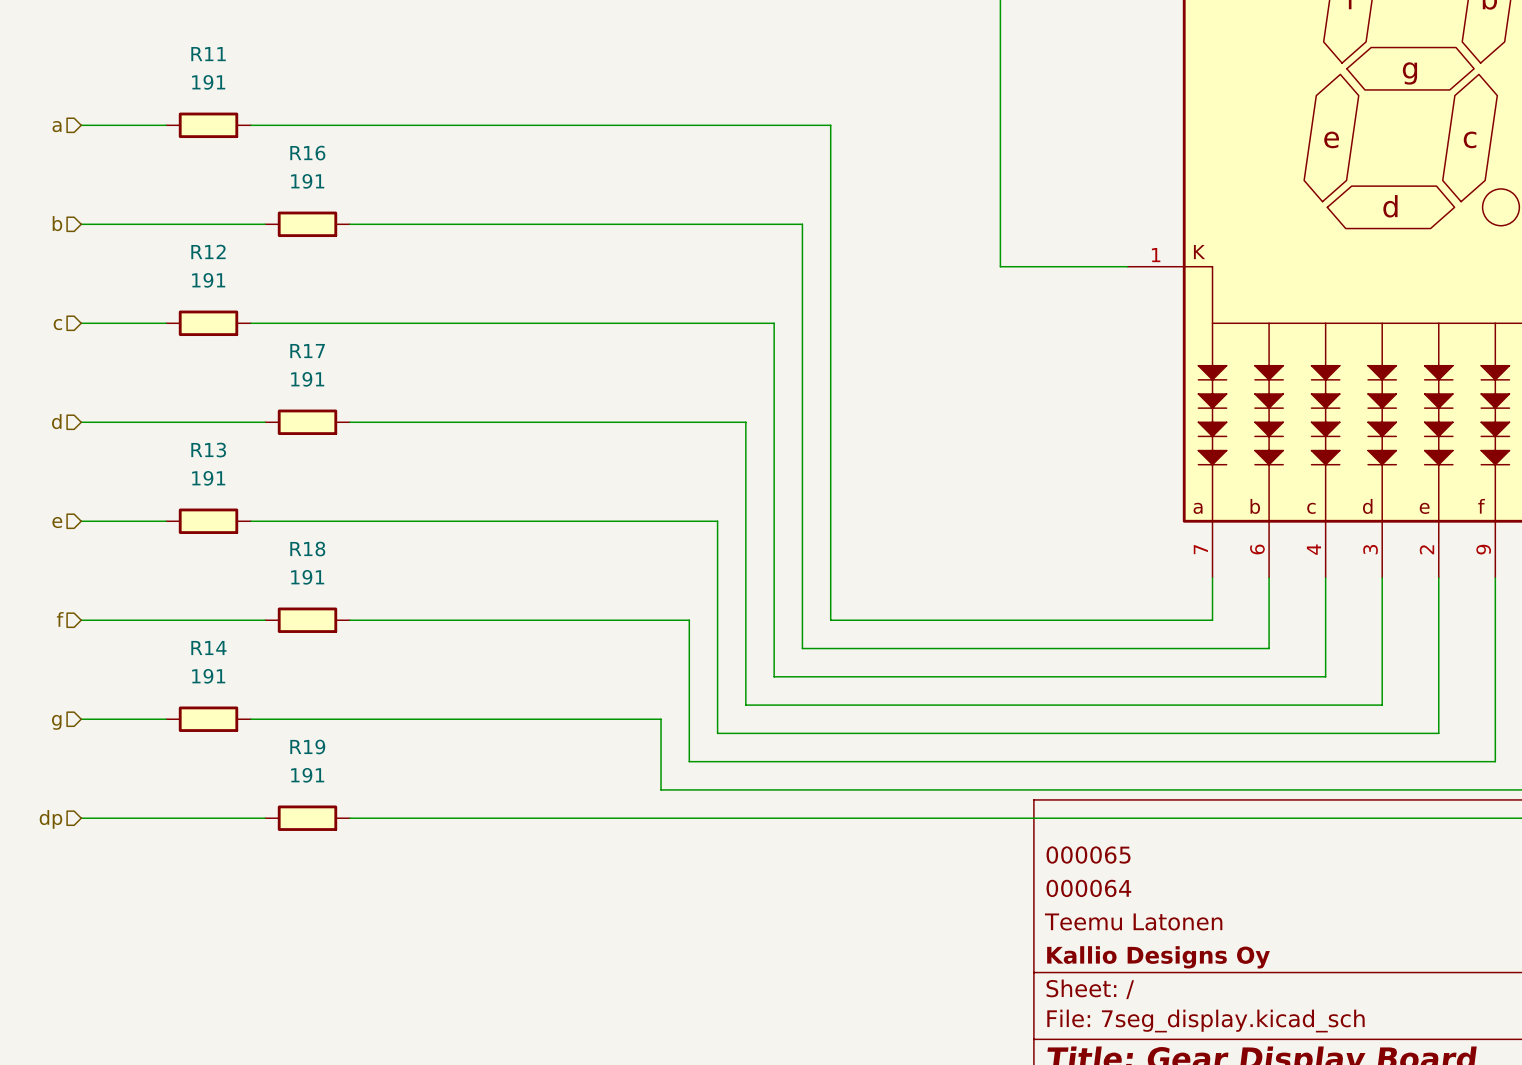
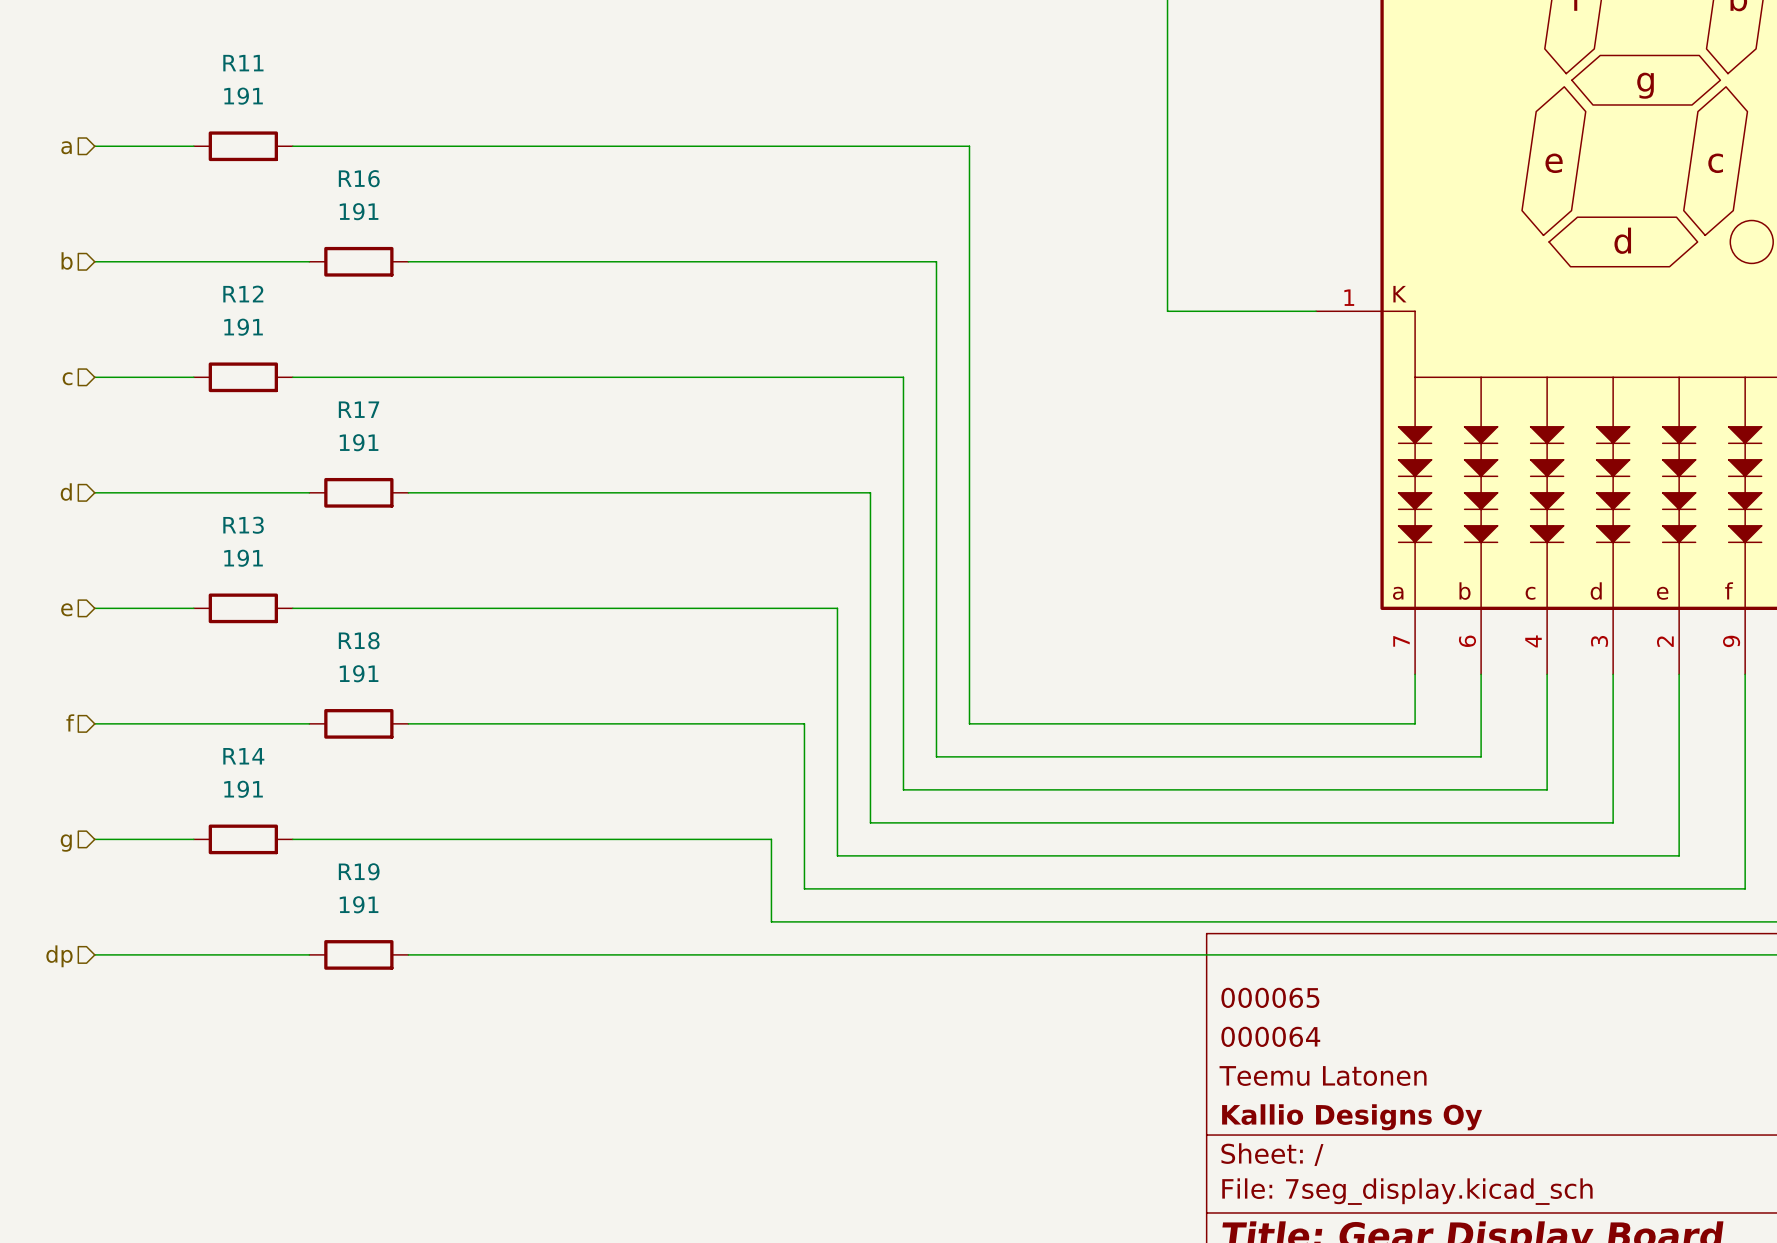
R11 symbol: [166, 112, 251, 139] -> [193, 131, 293, 162]
R16 symbol: [265, 211, 350, 238] -> [309, 246, 409, 277]
R12 symbol: [166, 310, 251, 337] -> [193, 362, 293, 393]
R17 symbol: [265, 409, 350, 436] -> [309, 477, 409, 508]
R13 symbol: [166, 508, 251, 534] -> [193, 593, 293, 624]
R18 symbol: [265, 607, 350, 633] -> [309, 709, 409, 739]
R14 symbol: [166, 706, 251, 732] -> [193, 824, 293, 855]
R19 symbol: [265, 805, 350, 831] -> [309, 940, 409, 970]

